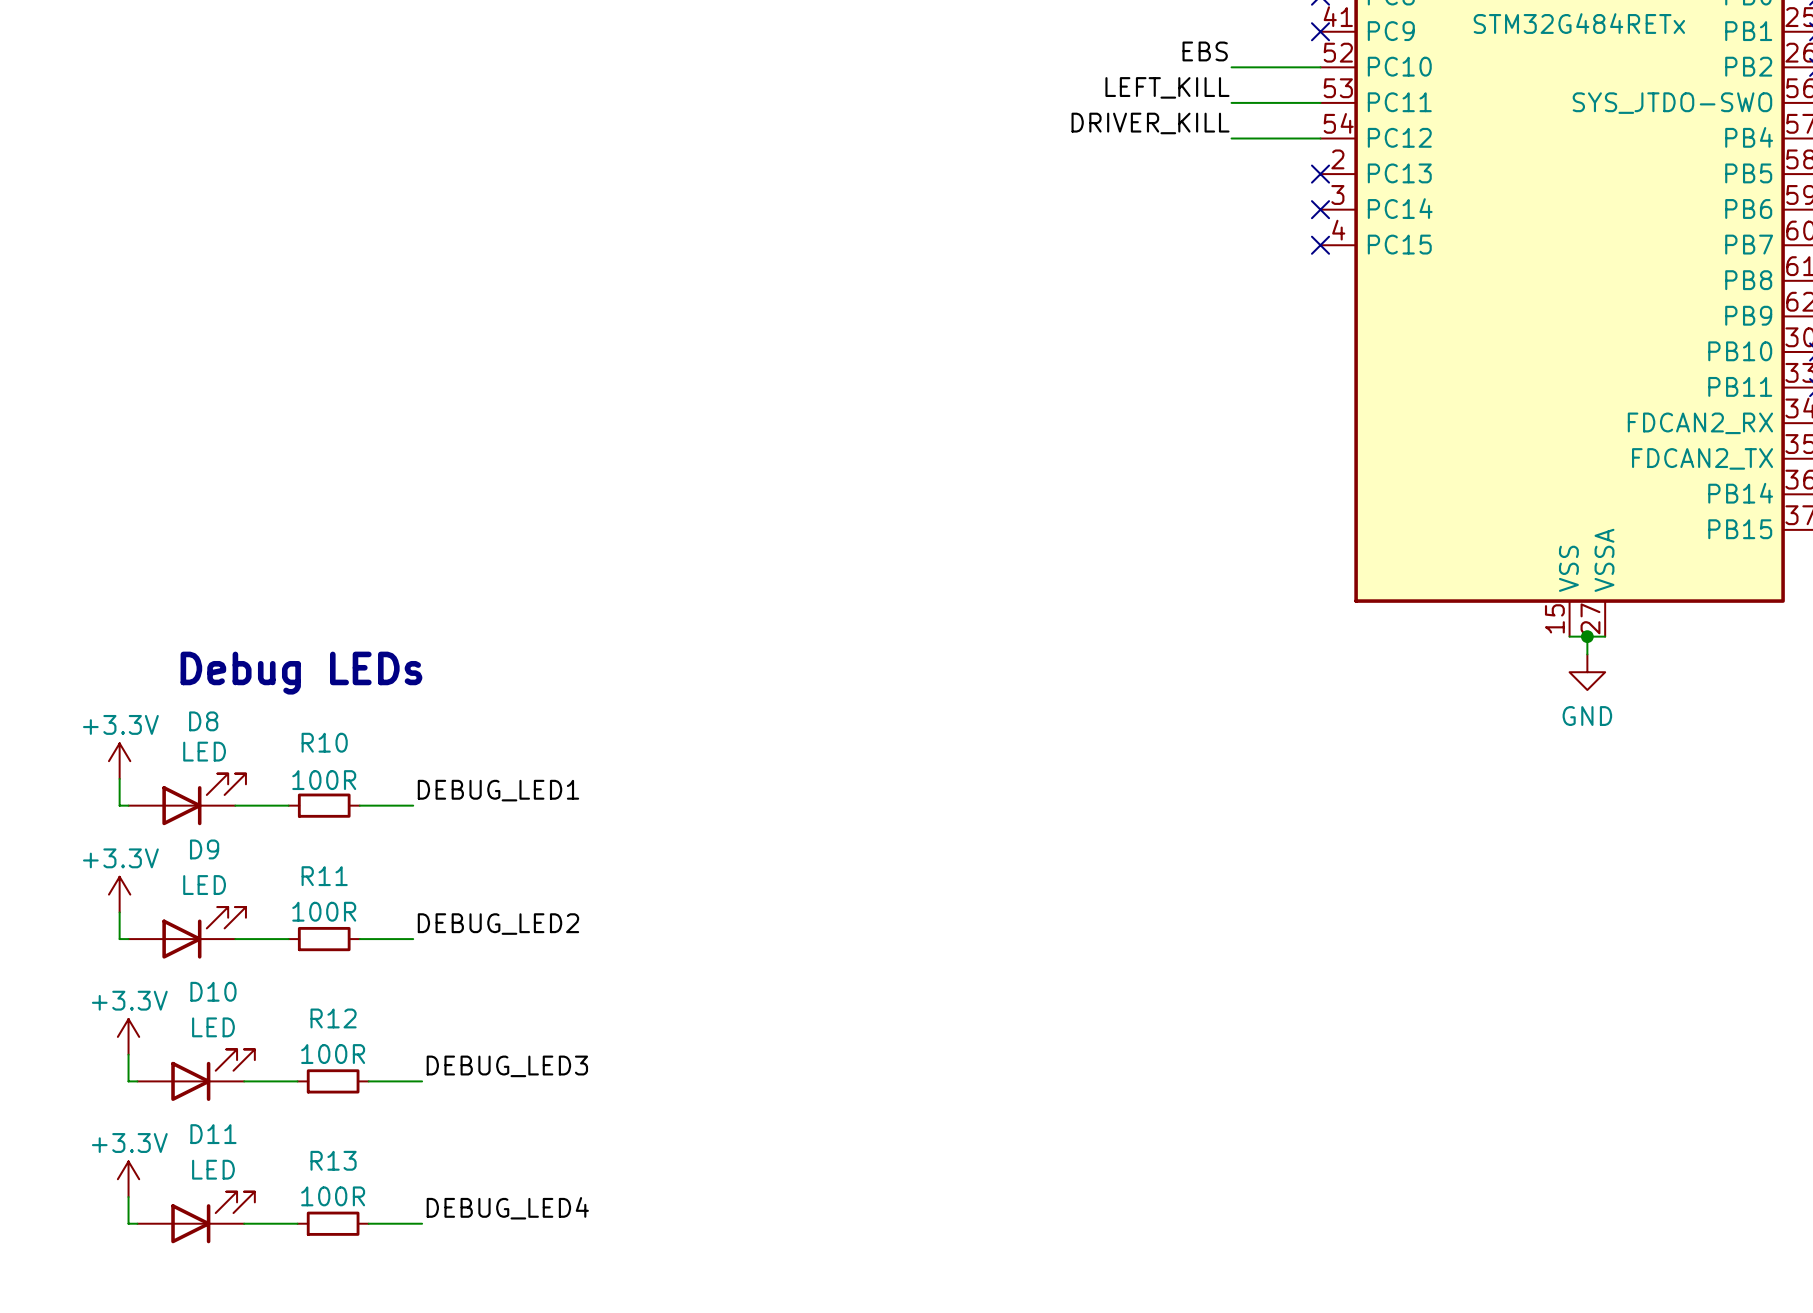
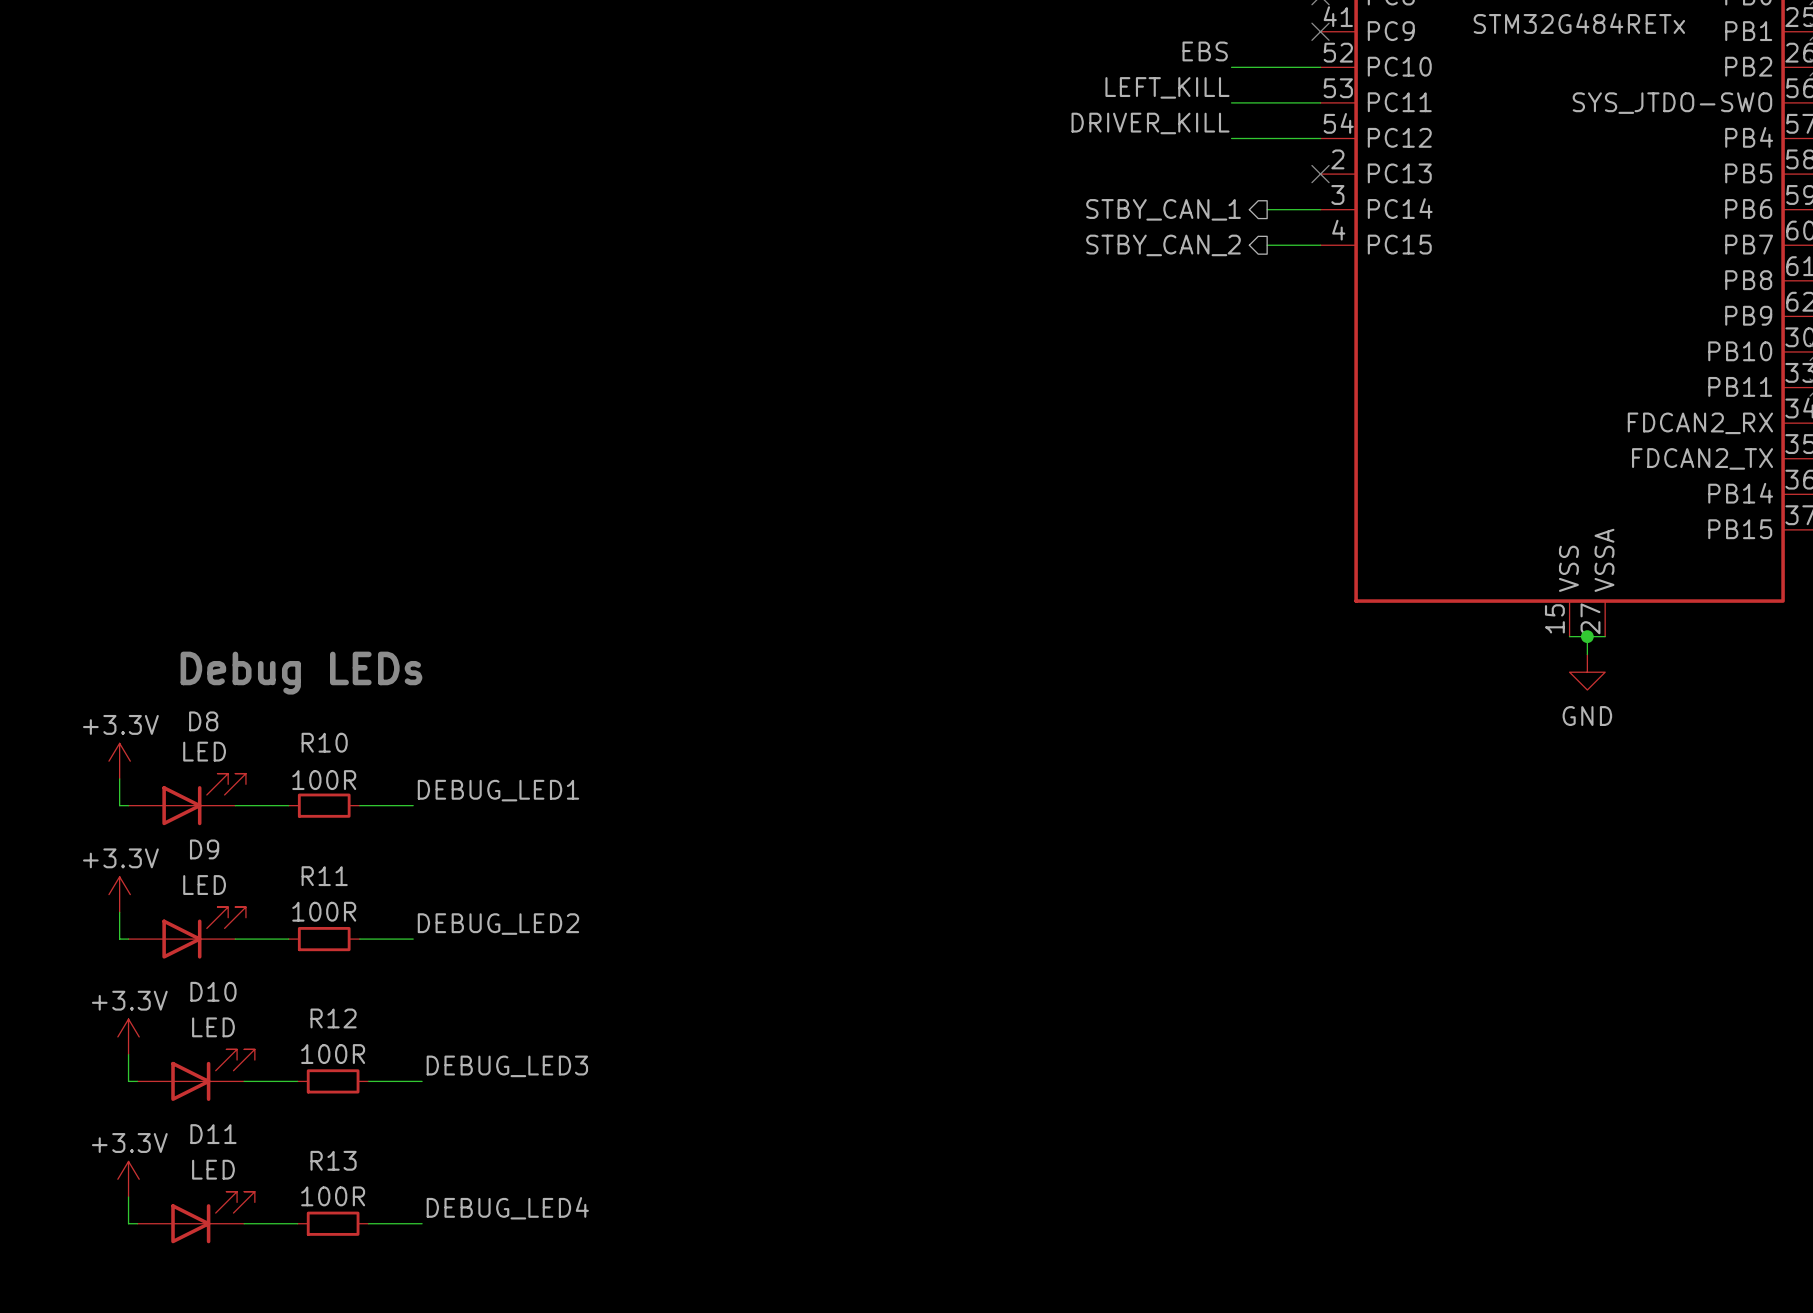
hierarchical label: none -> STBY_CAN_1 (1163, 209)
wire: none -> (1267, 209) (1320, 209)
no-connect mark: (1320, 209) -> none
hierarchical label: none -> STBY_CAN_2 (1163, 245)
wire: none -> (1267, 245) (1320, 245)
no-connect mark: (1320, 245) -> none

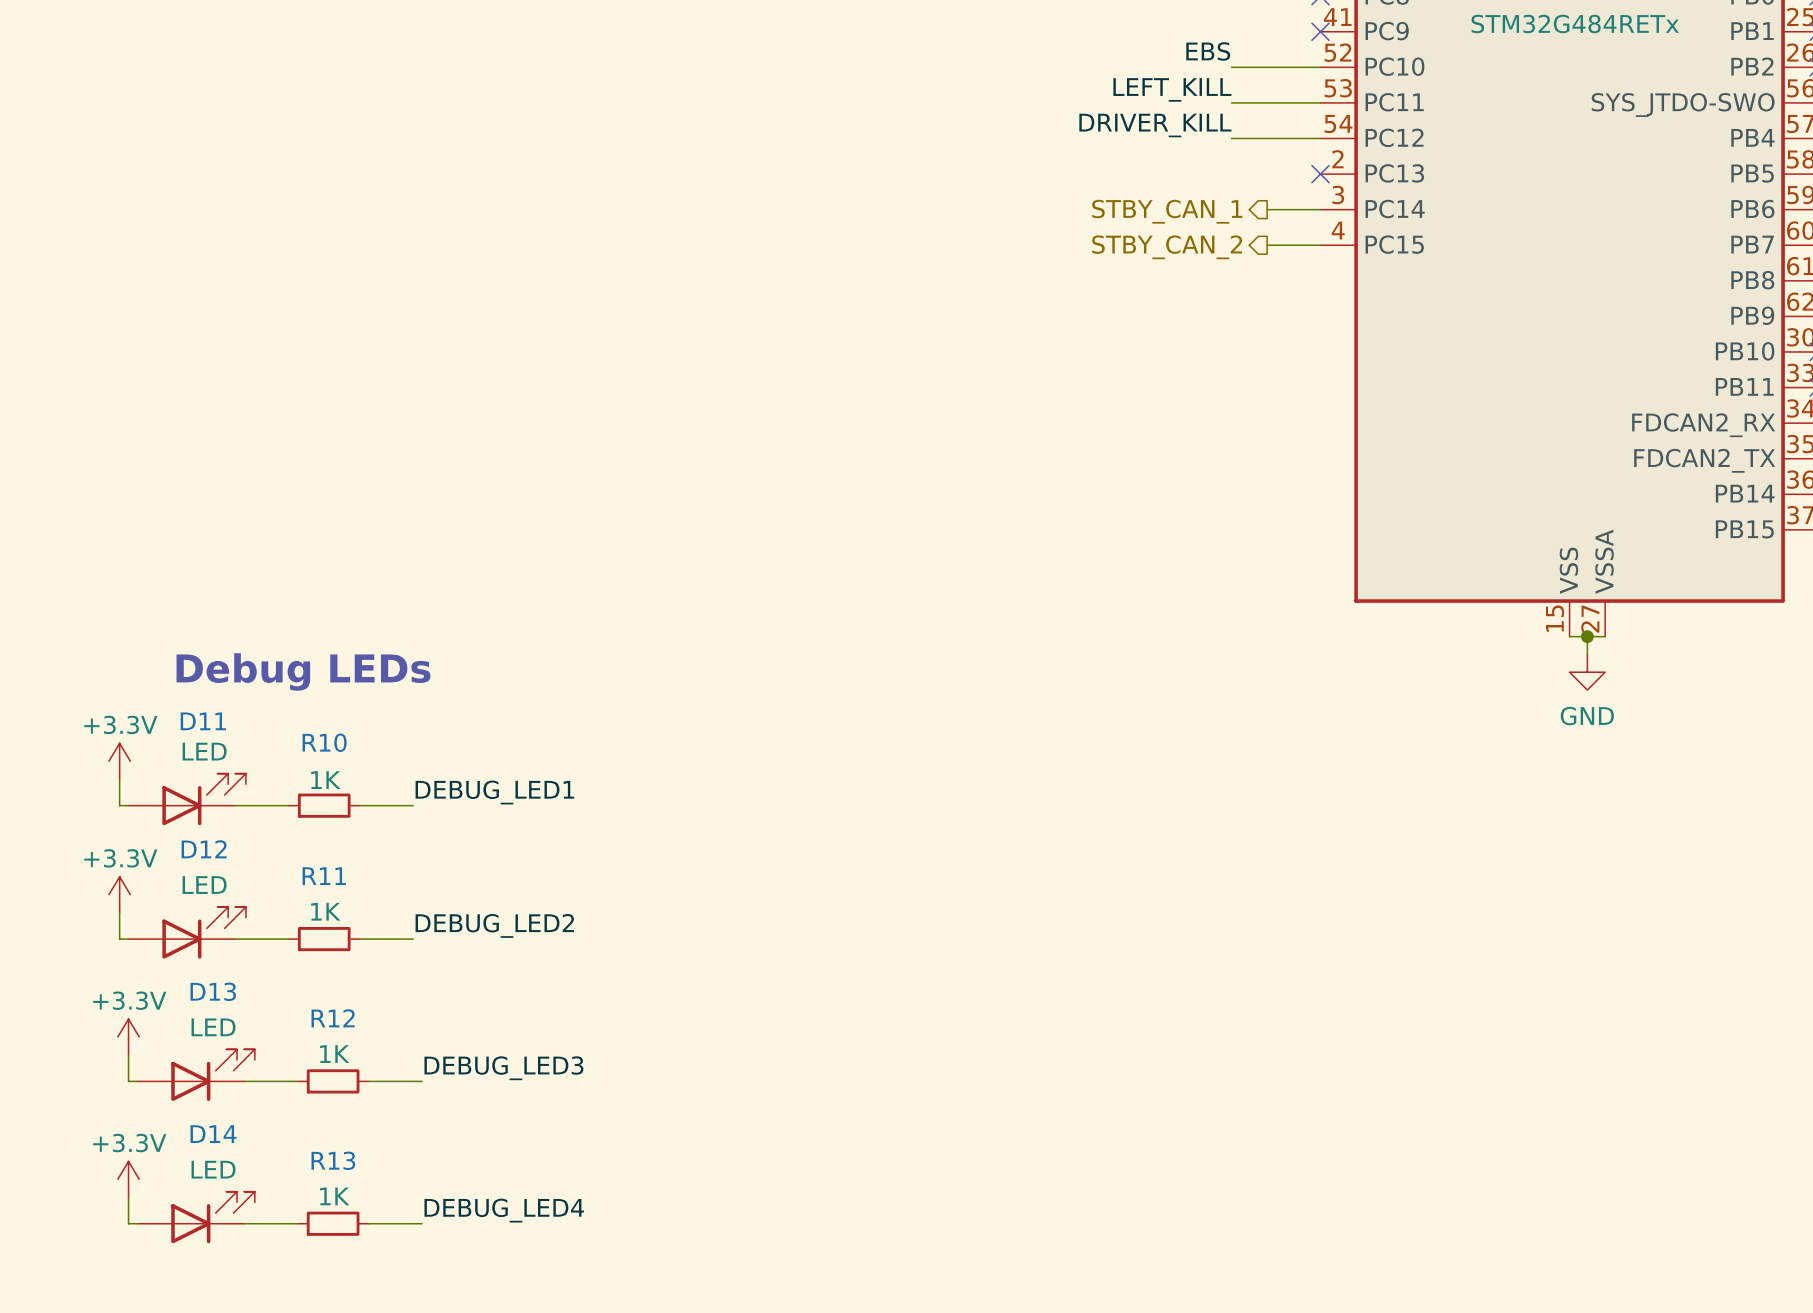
D8 name: D8 (203, 721) -> D11 (203, 721)
R10 value: 100R (324, 780) -> 1K (325, 780)
D9 name: D9 (204, 849) -> D12 (204, 849)
R11 value: 100R (324, 911) -> 1K (325, 911)
D10 name: D10 (213, 991) -> D13 (213, 991)
R12 value: 100R (333, 1054) -> 1K (334, 1054)
D11 name: D11 (213, 1134) -> D14 (213, 1134)
R13 value: 100R (333, 1196) -> 1K (334, 1196)

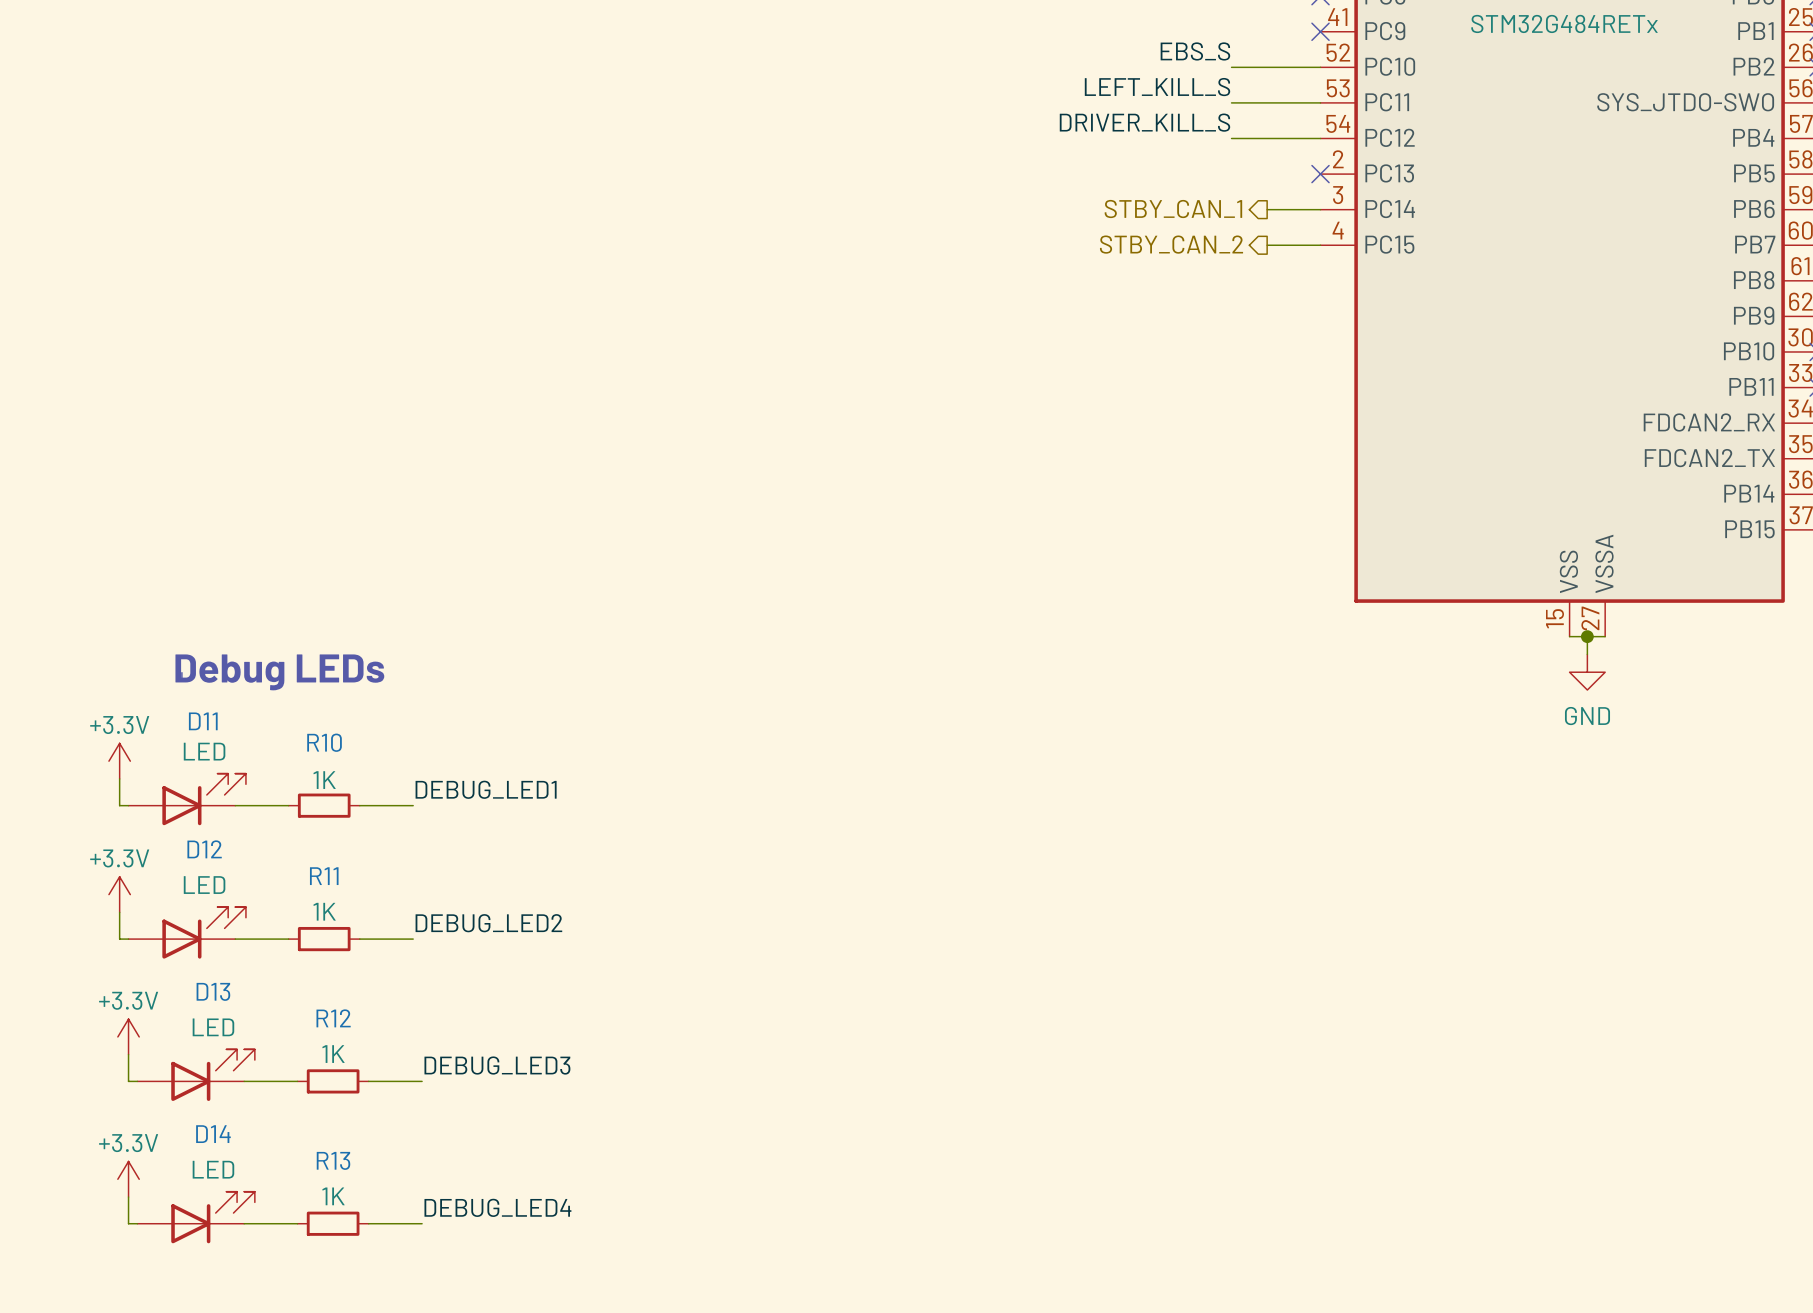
label: EBS (1208, 51) -> EBS_S (1195, 51)
label: LEFT_KILL (1172, 89) -> LEFT_KILL_S (1157, 87)
label: DRIVER_KILL (1155, 125) -> DRIVER_KILL_S (1144, 122)

